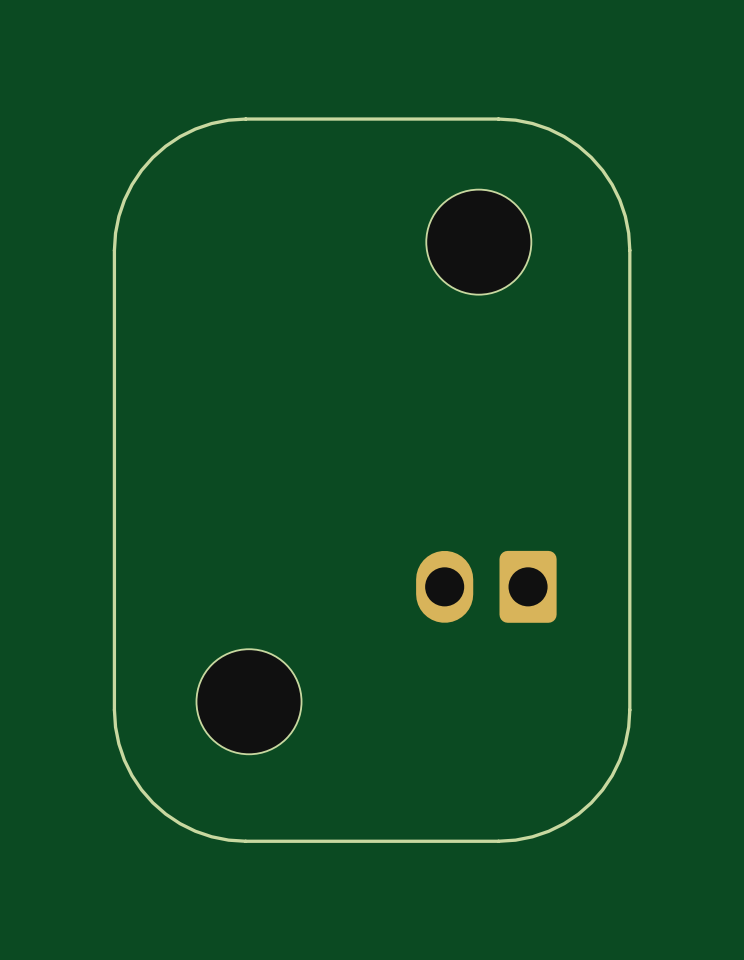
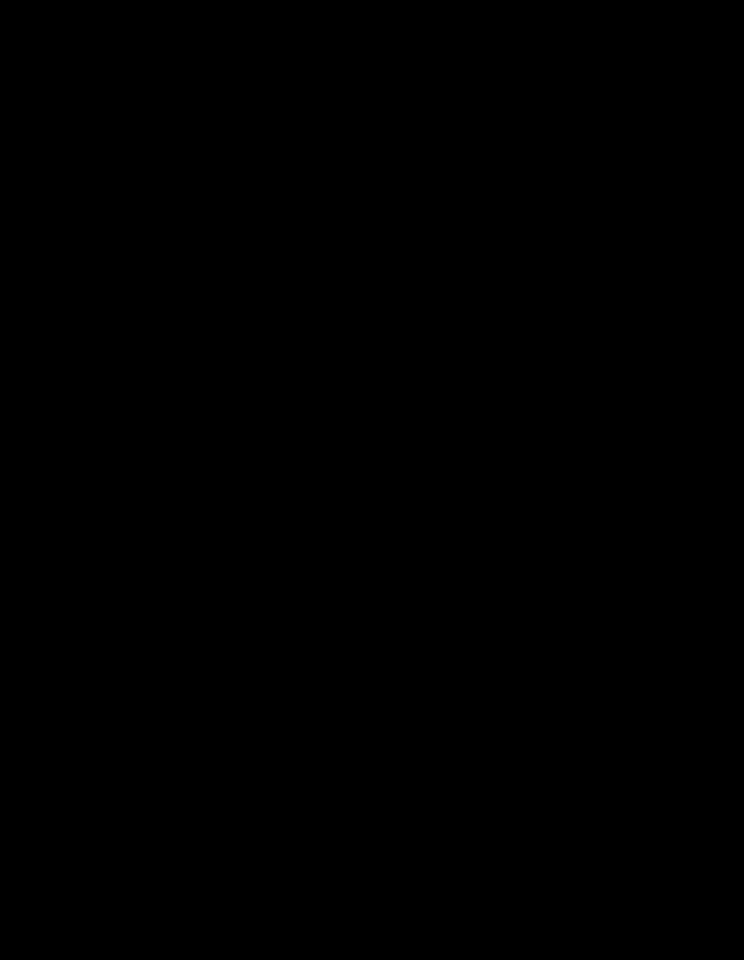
board edge: (498, 119) (245, 119) (211, 123) (180, 136) (152, 157) (132, 184) (124, 200) (115, 233) (114, 250) (115, 727) (124, 760) (141, 789) (165, 814) (195, 831) (211, 836) (245, 841) (515, 840) (548, 831) (578, 814) (602, 789) (619, 760) (625, 743) (629, 709) (628, 233) (625, 216) (612, 184) (602, 170) (578, 146) (548, 129) (532, 123) (498, 119) -> none
part: (478, 242) -> none
part: (486, 586) -> none
part: (249, 701) -> none

